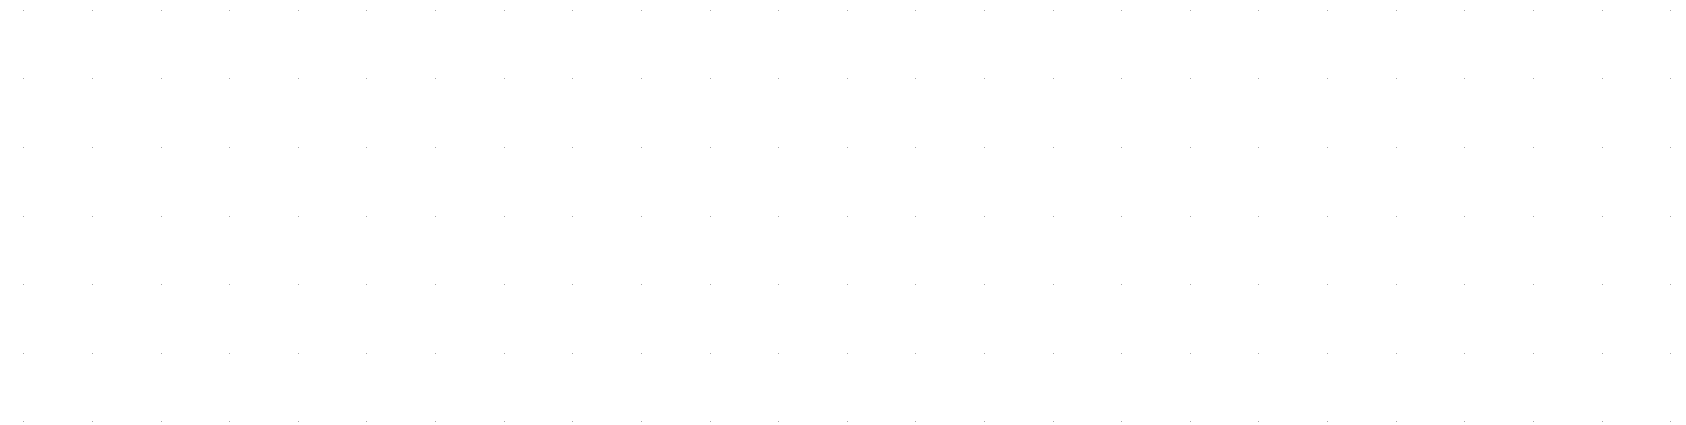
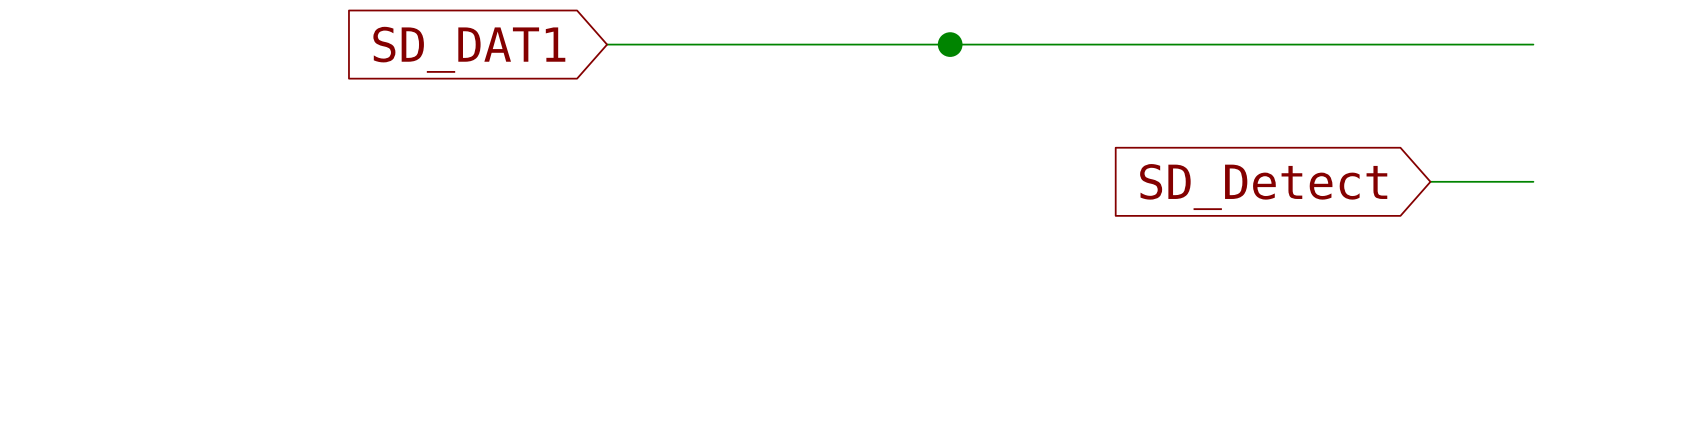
wire: none -> (607, 44) (1533, 44)
junction: none -> (950, 44)
global label: none -> SD_DAT1 (469, 49)
wire: none -> (1430, 181) (1533, 181)
global label: none -> SD_Detect (1263, 187)

